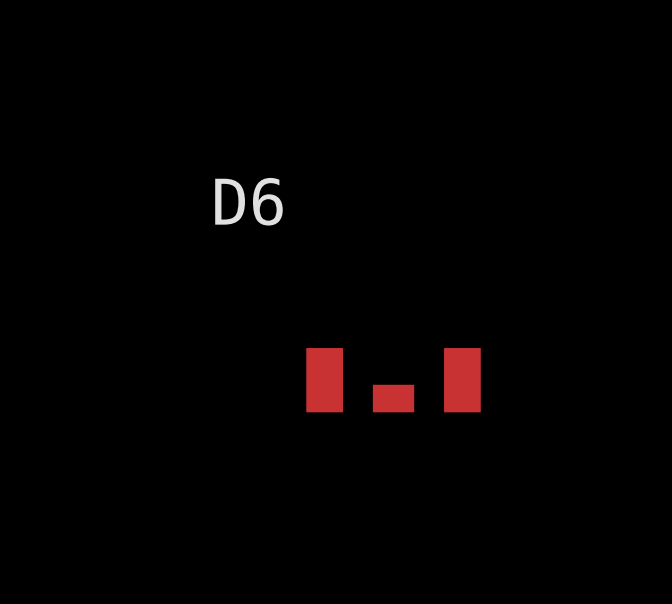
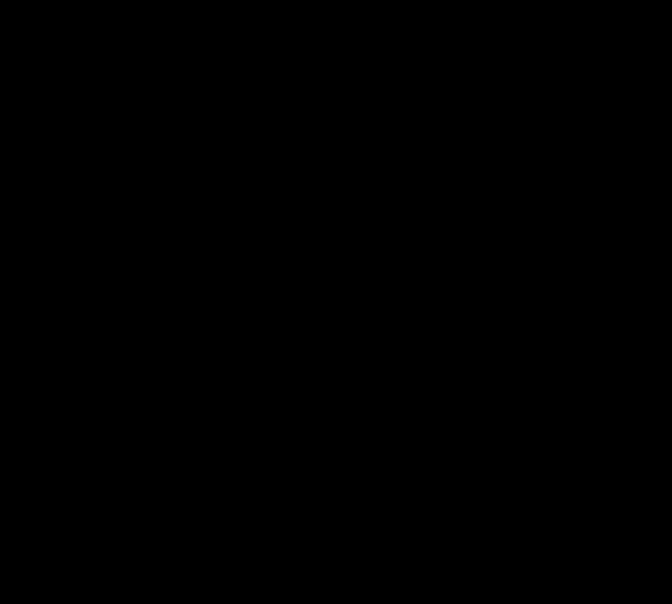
D6: (393, 380) -> none

